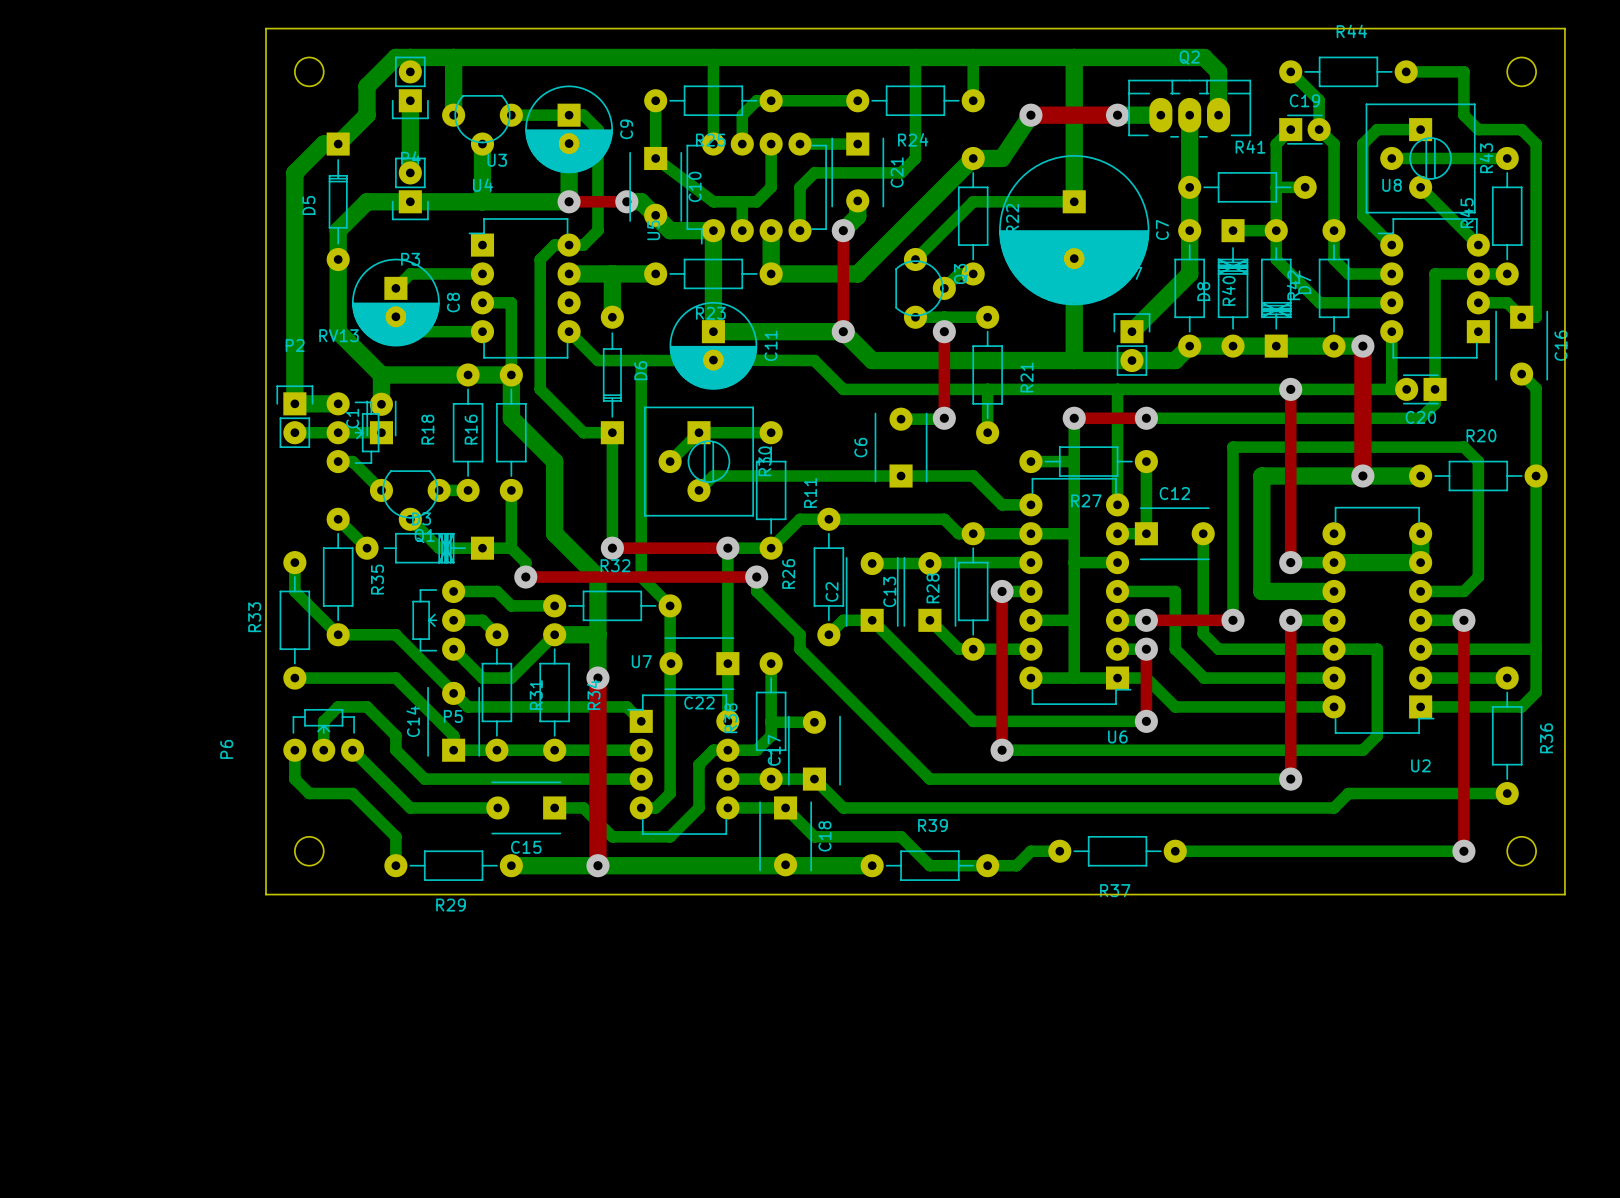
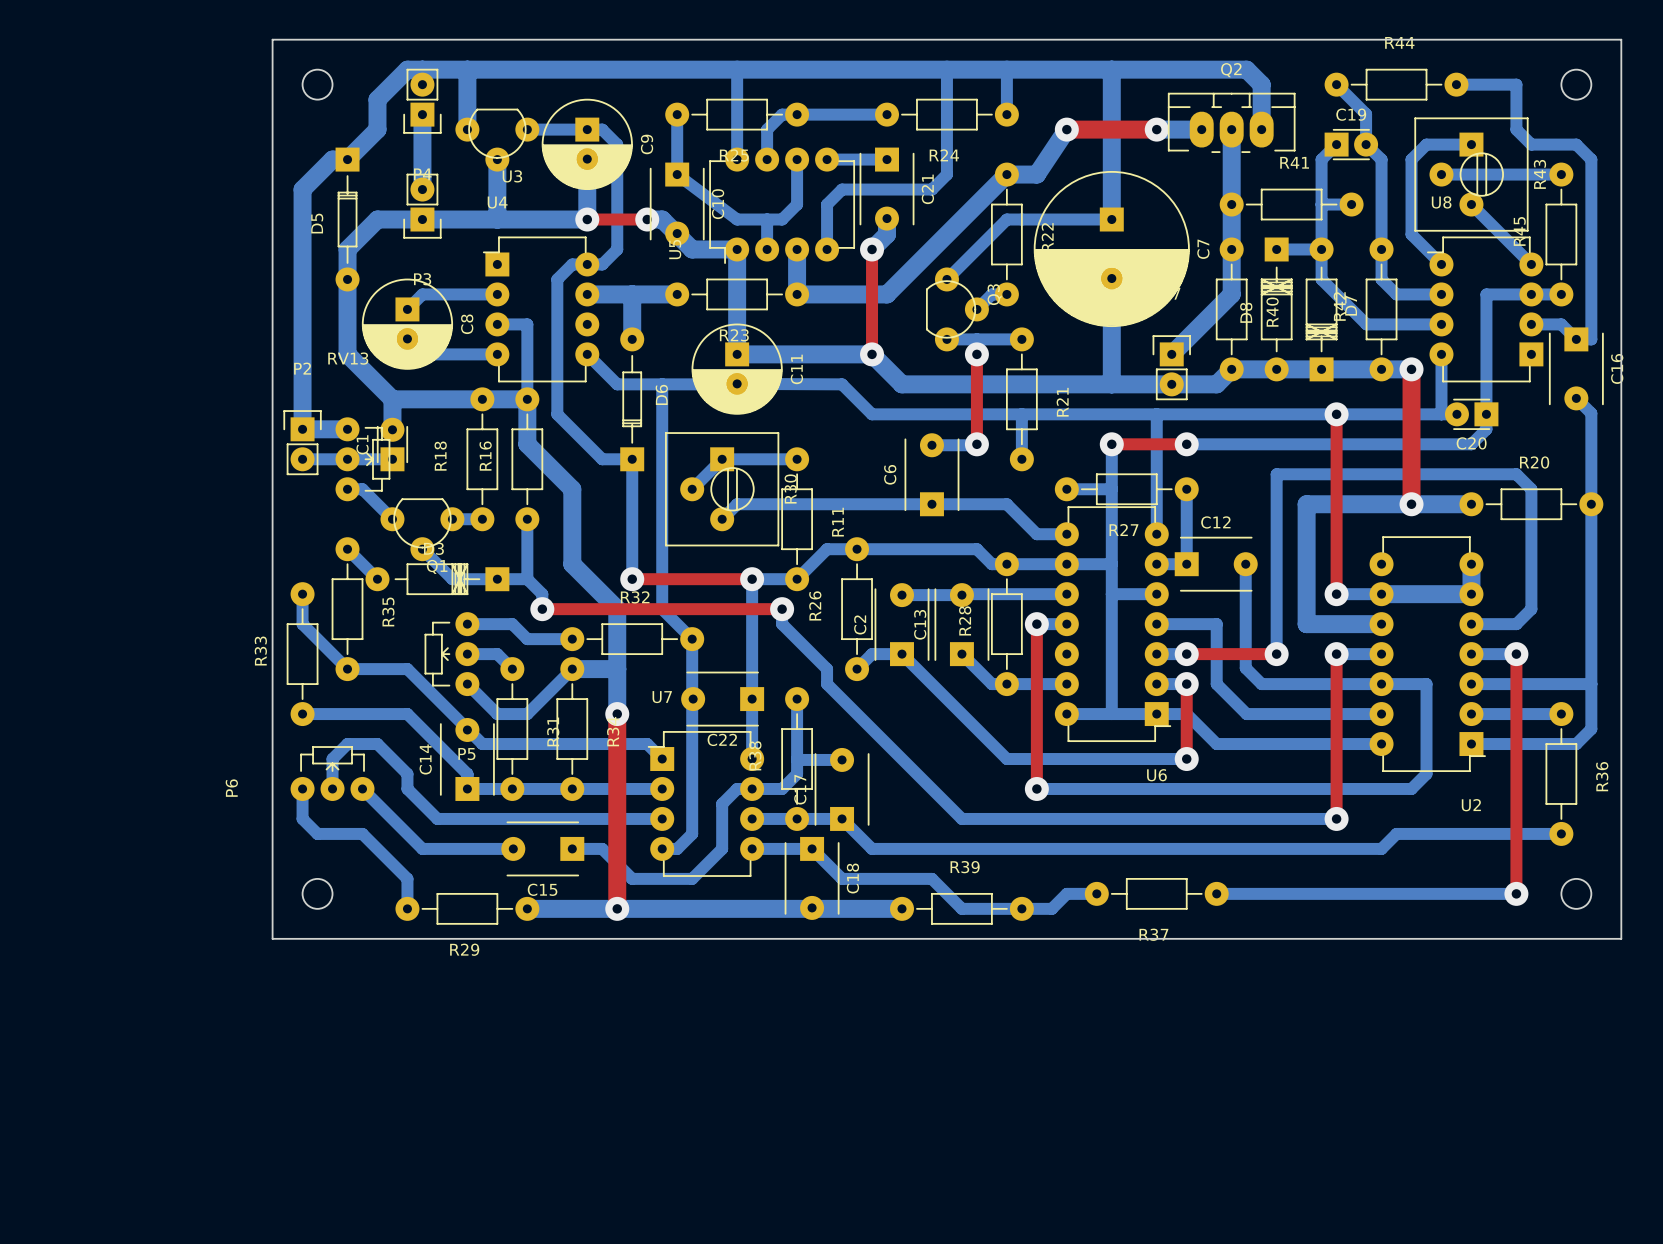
bottom track: (1030, 620) (1074, 620) -> none

